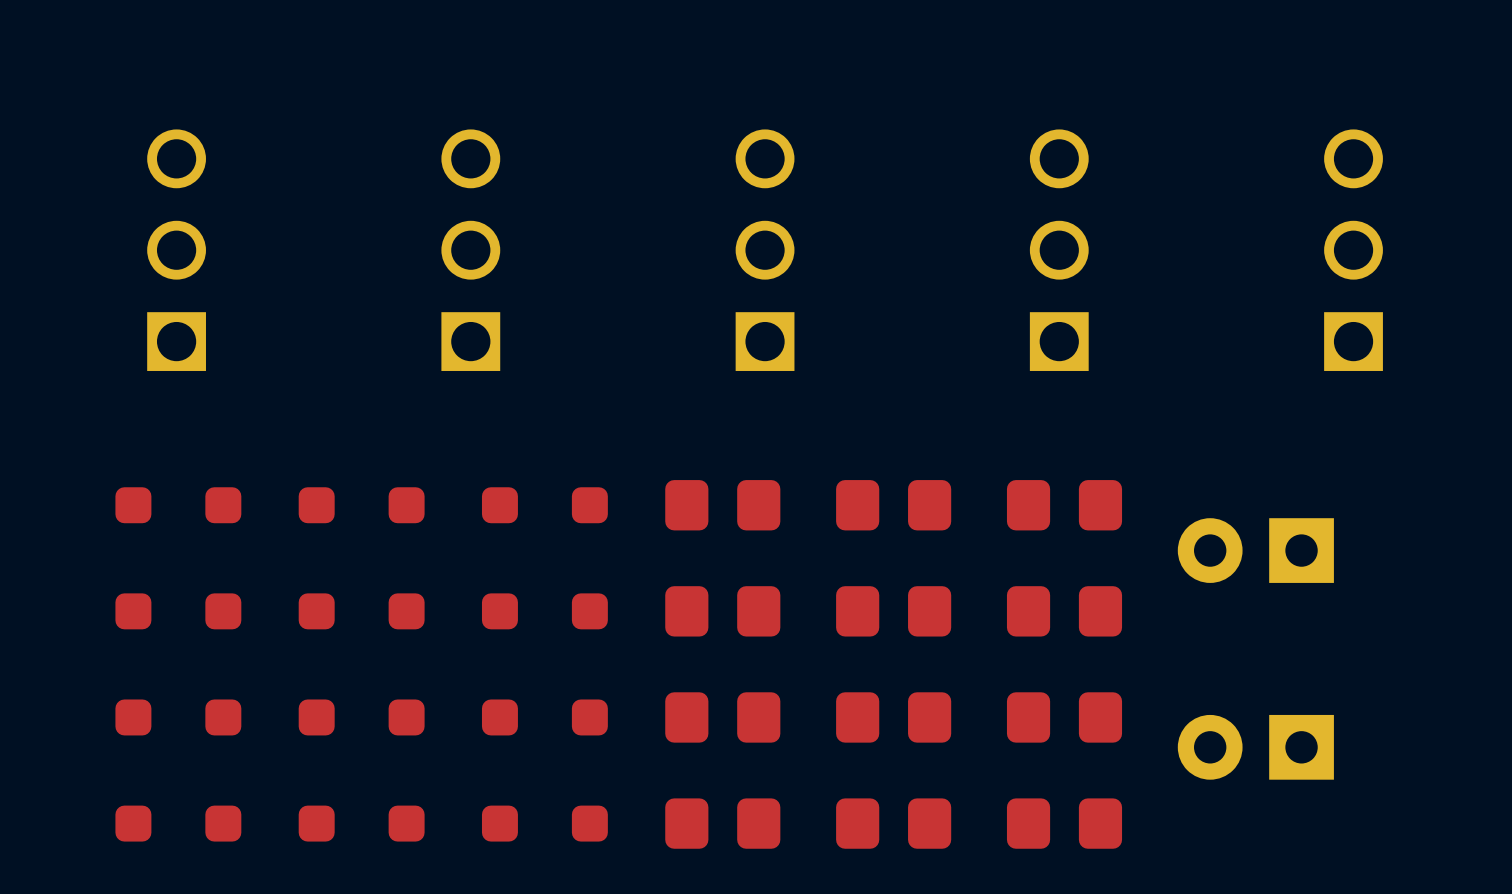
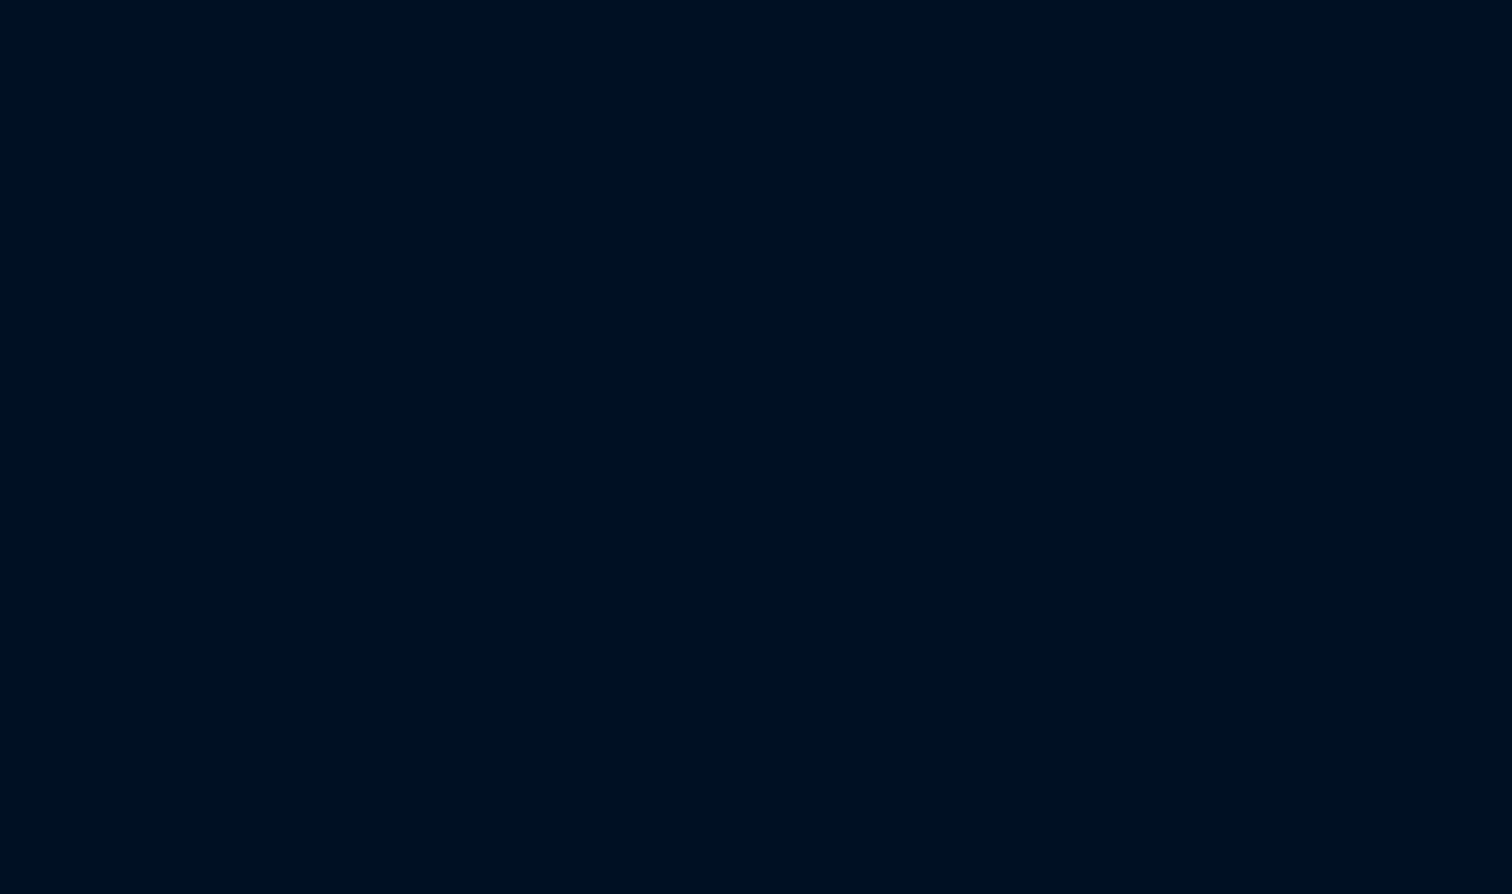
part: (176, 250) -> none
part: (470, 250) -> none
part: (765, 250) -> none
part: (1059, 250) -> none
part: (1353, 250) -> none
part: (178, 505) -> none
part: (361, 505) -> none
part: (544, 505) -> none
part: (722, 505) -> none
part: (893, 505) -> none
part: (1064, 505) -> none
part: (1255, 550) -> none
part: (178, 611) -> none
part: (361, 611) -> none
part: (544, 611) -> none
part: (722, 611) -> none
part: (893, 611) -> none
part: (1064, 611) -> none
part: (178, 717) -> none
part: (361, 717) -> none
part: (544, 717) -> none
part: (722, 717) -> none
part: (893, 717) -> none
part: (1064, 717) -> none
part: (1255, 747) -> none
part: (178, 823) -> none
part: (361, 823) -> none
part: (544, 823) -> none
part: (722, 823) -> none
part: (893, 823) -> none
part: (1064, 823) -> none

